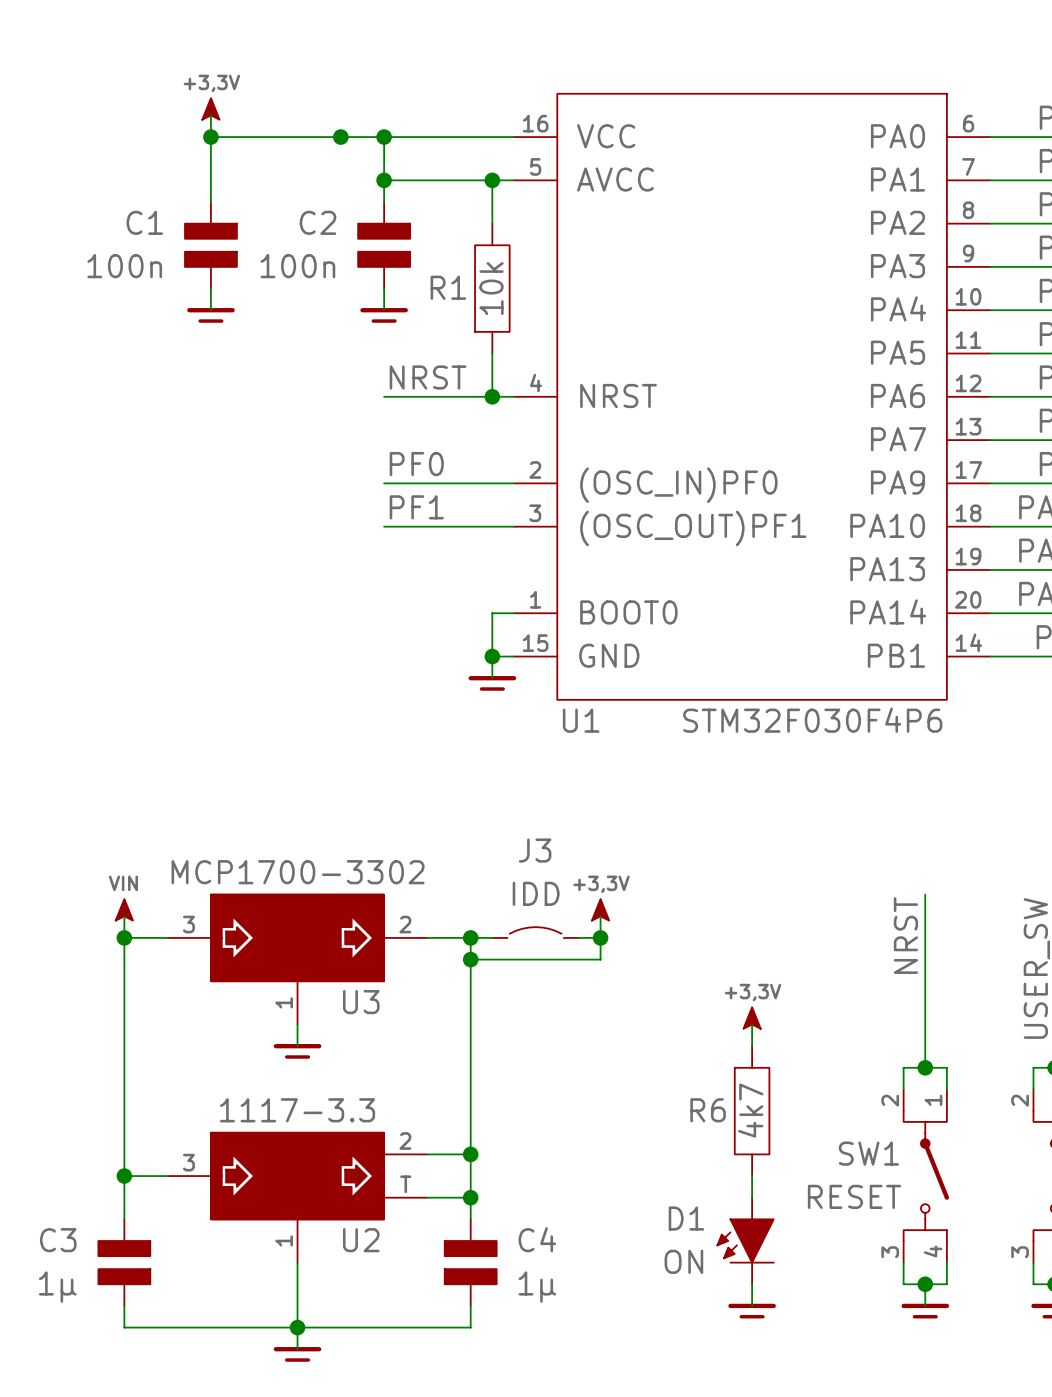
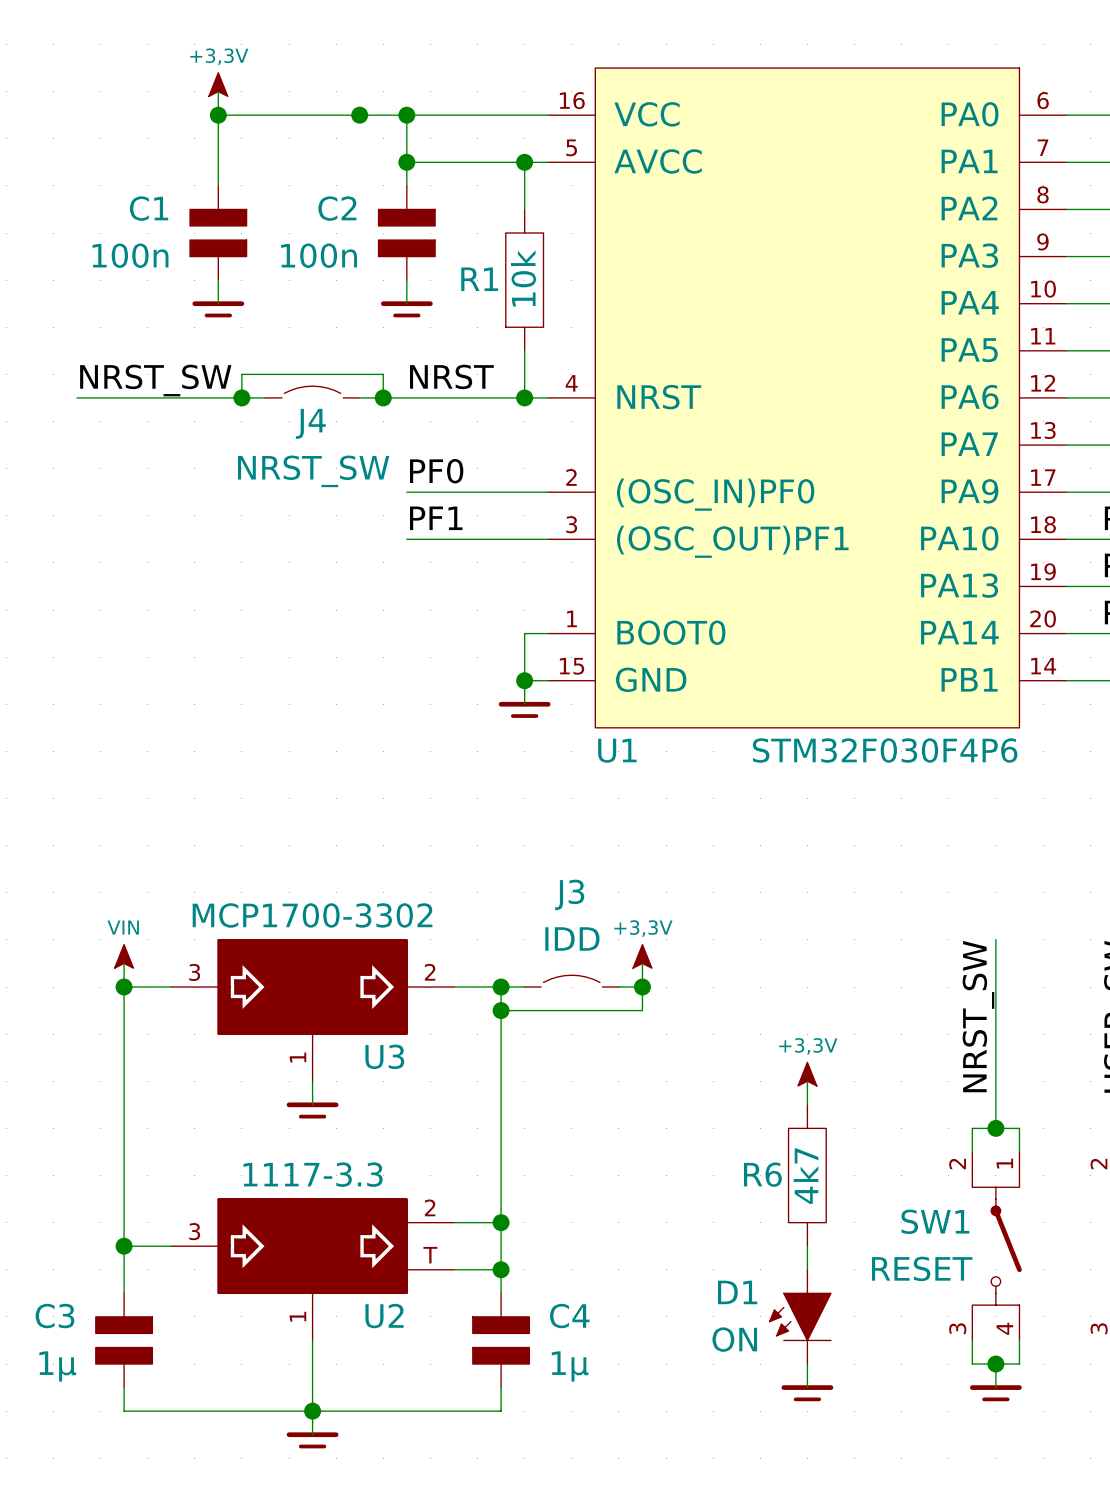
label: none -> NRST_SW (155, 380)
J4: none -> NRST_SW (312, 392)
wire: none -> (76, 397) (265, 397)
wire: none -> (241, 397) (241, 374) (383, 374) (383, 397)
junction: none -> (241, 397)
wire: none -> (359, 397) (406, 397)
junction: none -> (383, 397)
label: NRST (905, 935) -> NRST_SW (978, 1016)

